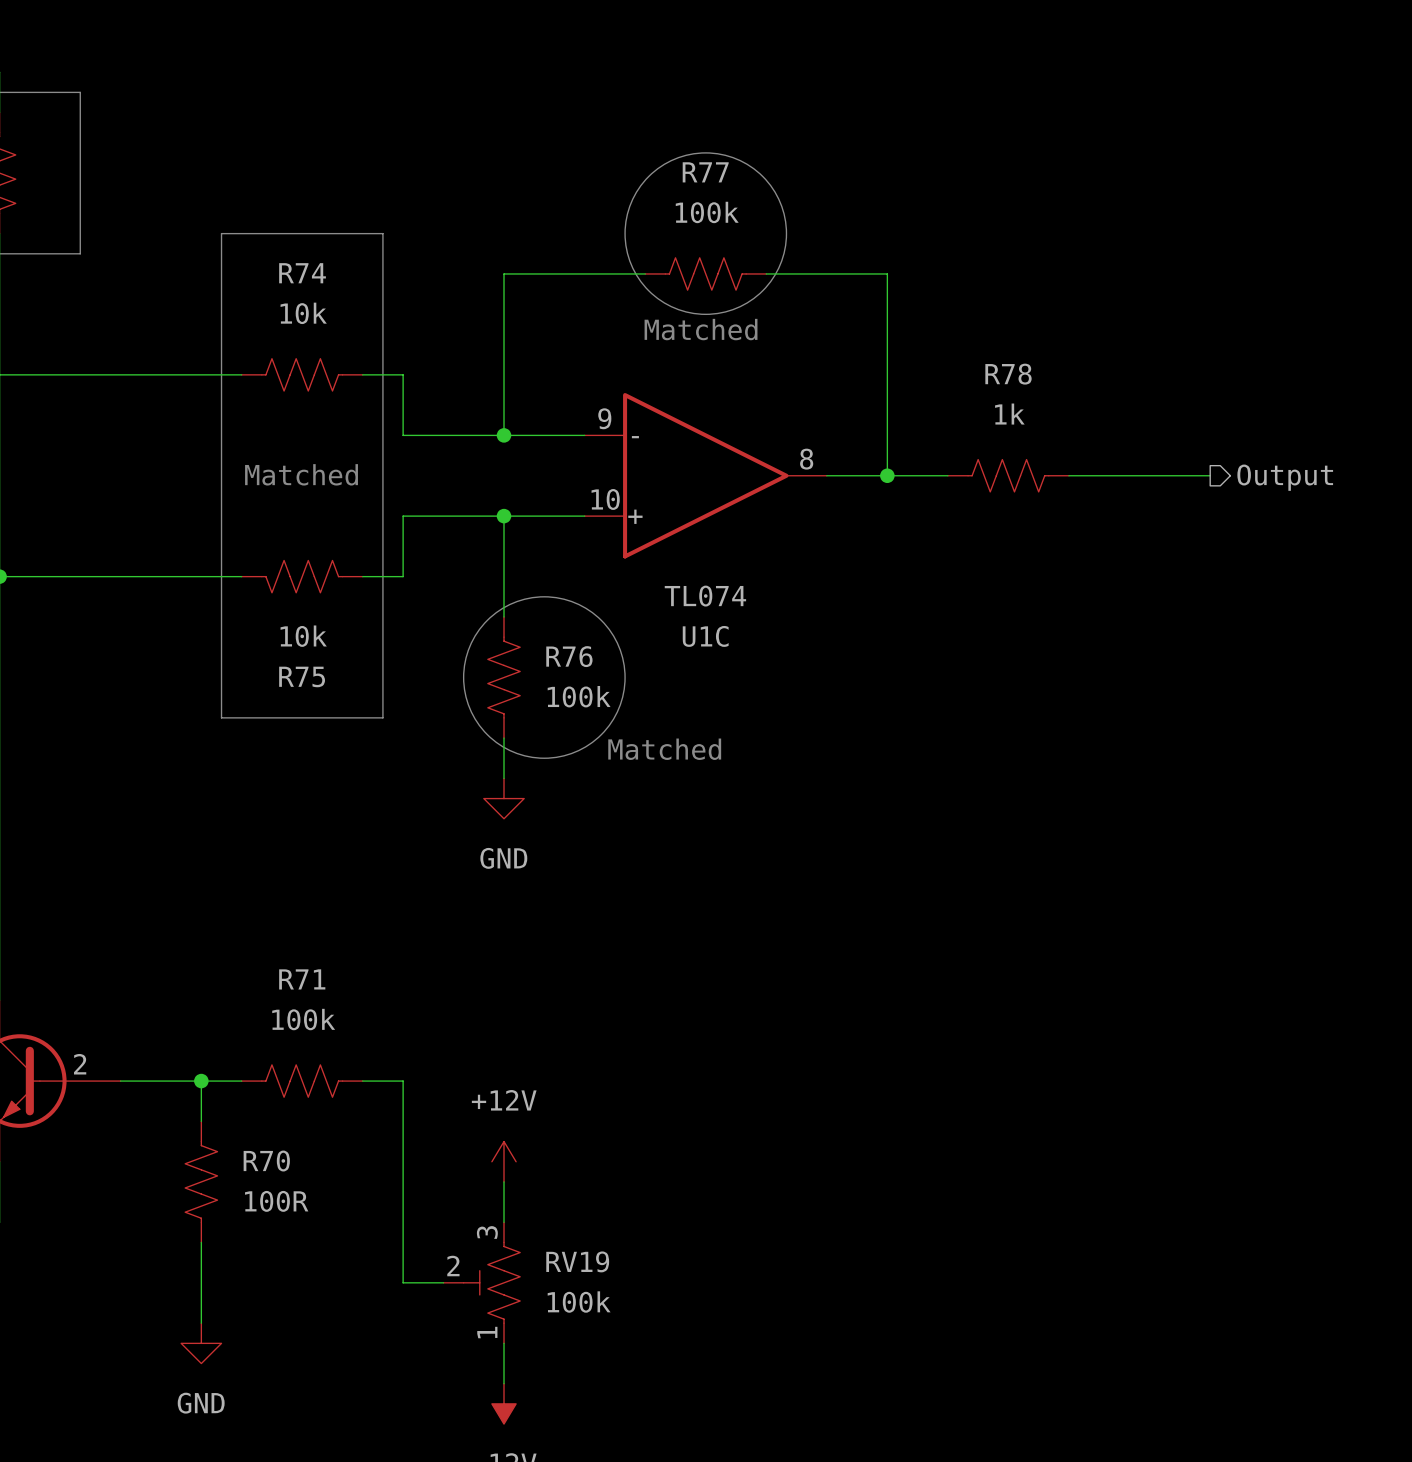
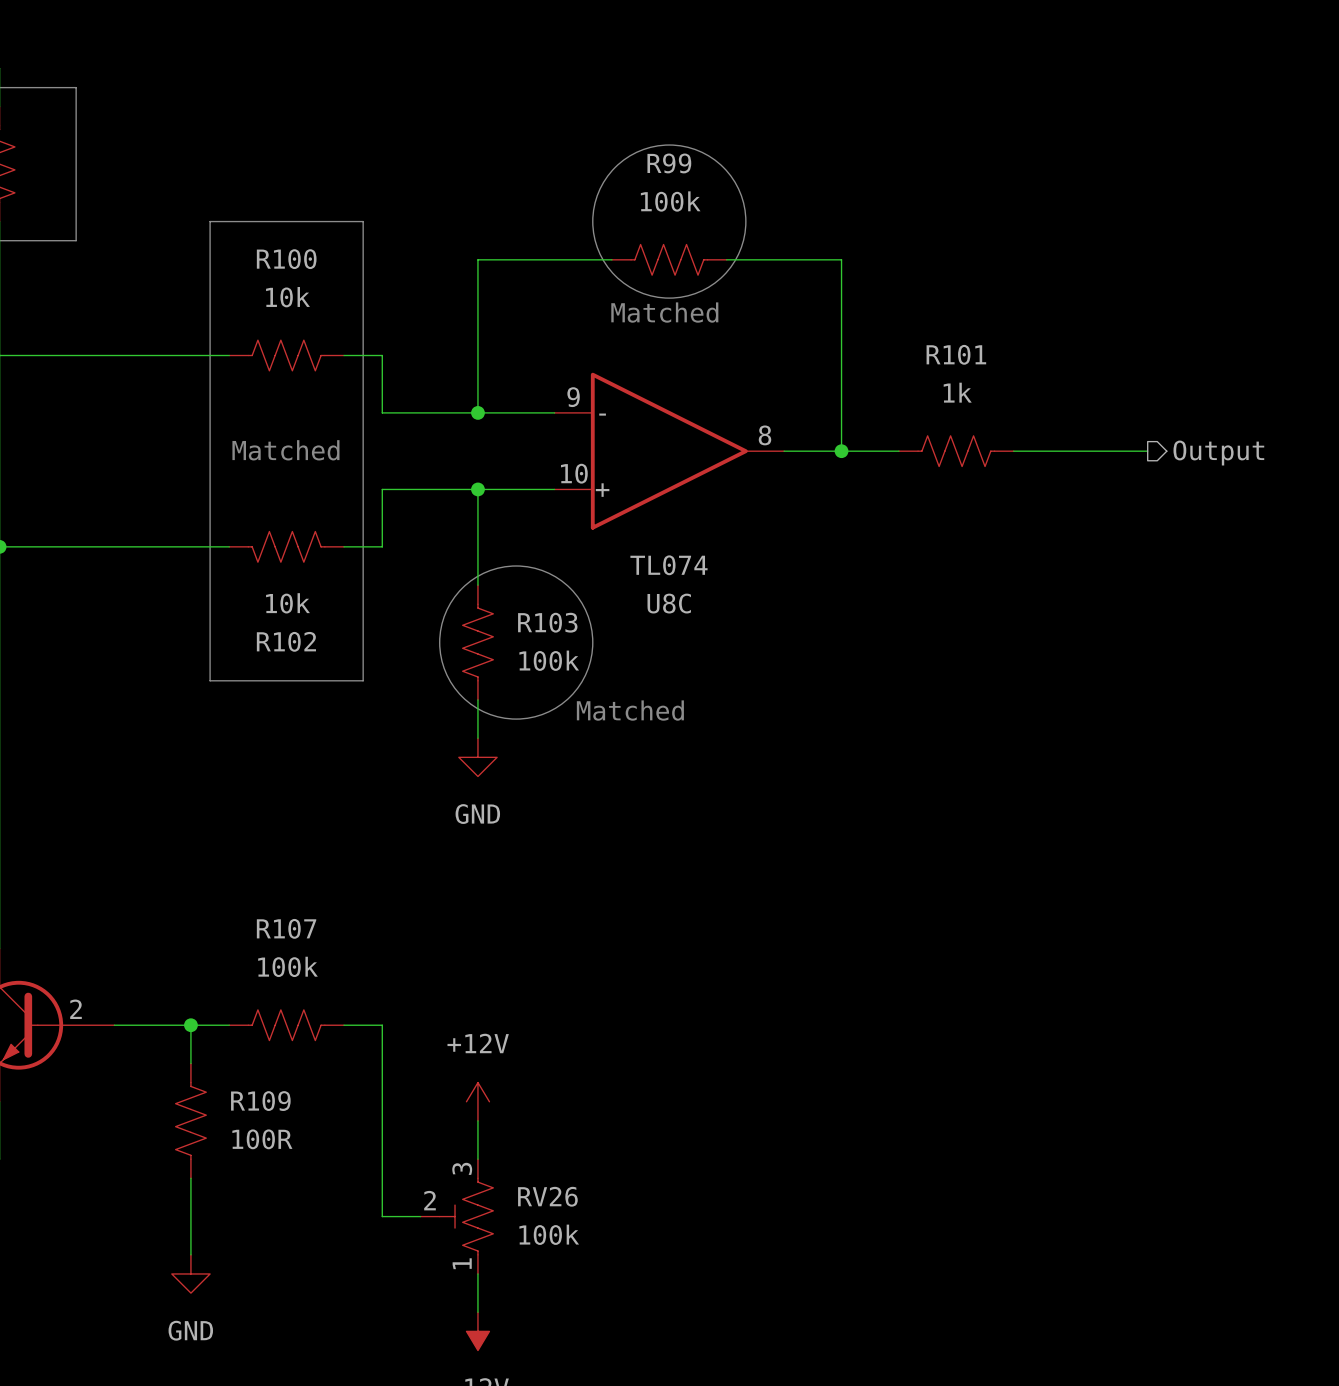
R77 name: R77 (705, 172) -> R99 (669, 163)
R74 name: R74 (302, 273) -> R100 (286, 259)
R78 name: R78 (1008, 374) -> R101 (956, 354)
U1C name: U1C (705, 636) -> U8C (669, 603)
R76 name: R76 (569, 656) -> R103 (547, 622)
R75 name: R75 (302, 676) -> R102 (286, 641)
R71 name: R71 (302, 979) -> R107 (286, 928)
R70 name: R70 (266, 1161) -> R109 (260, 1101)
RV19 name: RV19 (577, 1261) -> RV26 (547, 1196)

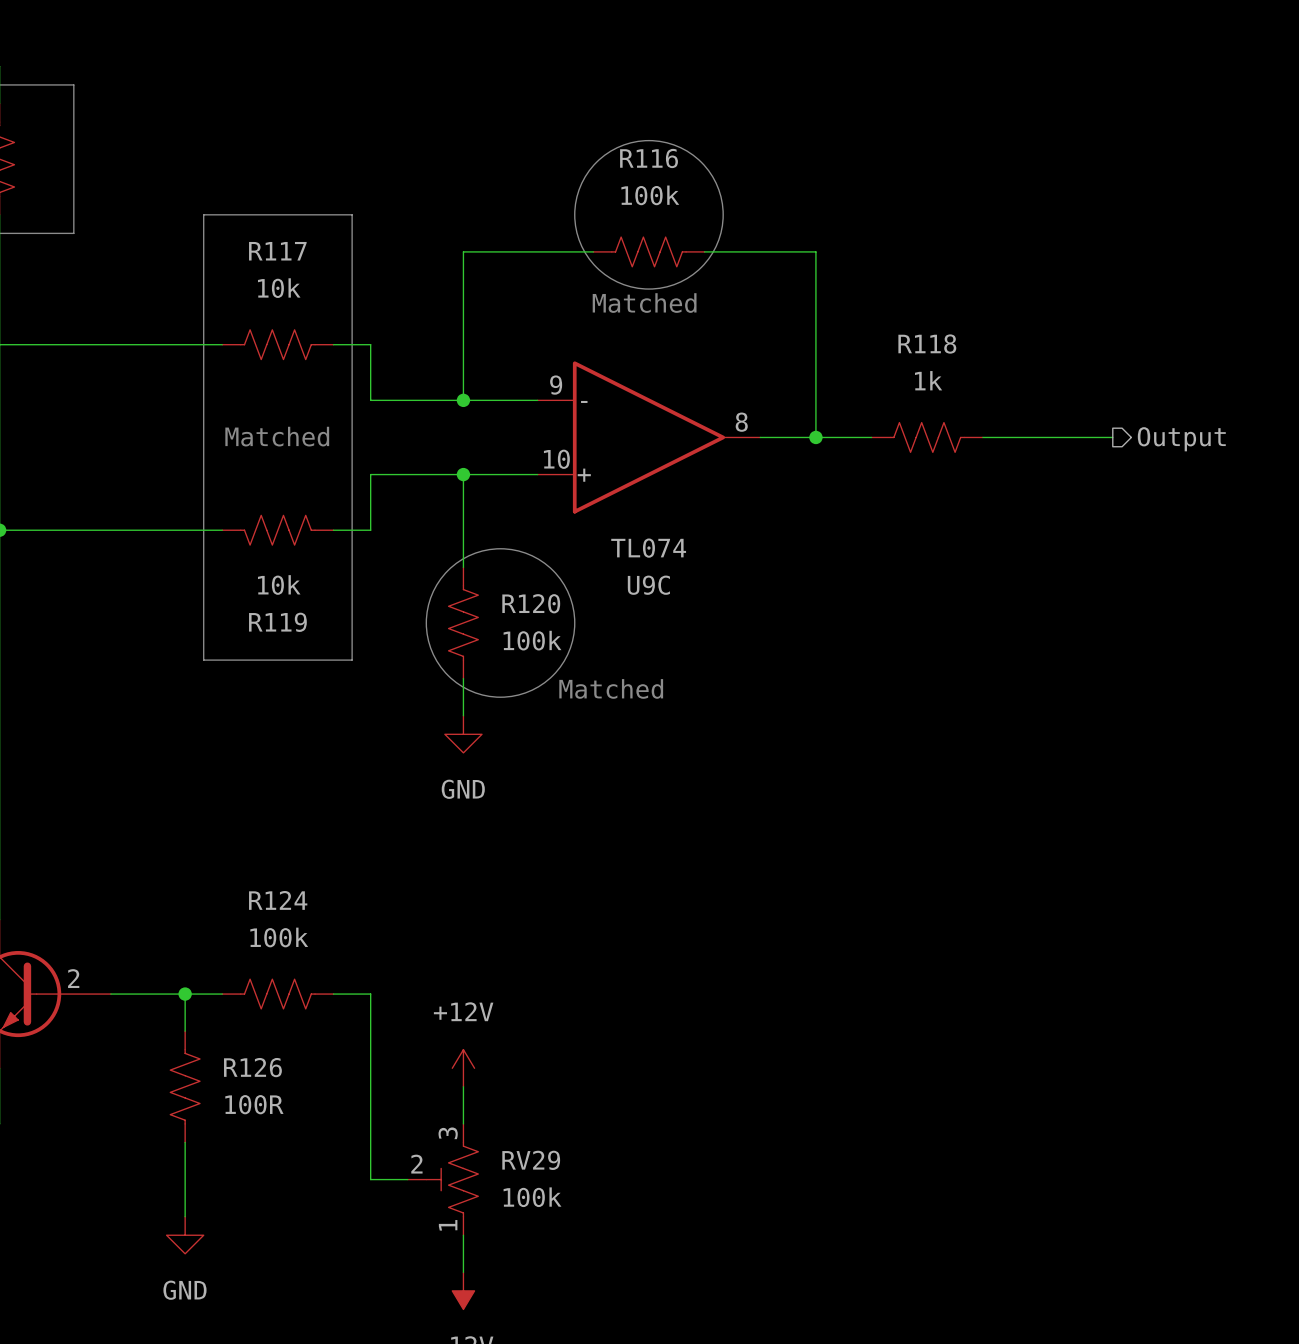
R99 name: R99 (669, 163) -> R116 (649, 158)
R100 name: R100 (286, 259) -> R117 (277, 251)
R101 name: R101 (956, 354) -> R118 (927, 344)
U8C name: U8C (669, 603) -> U9C (648, 585)
R103 name: R103 (547, 622) -> R120 (531, 603)
R102 name: R102 (286, 641) -> R119 (277, 622)
R107 name: R107 (286, 928) -> R124 (278, 900)
R109 name: R109 (260, 1101) -> R126 (252, 1067)
RV26 name: RV26 (547, 1196) -> RV29 (531, 1160)

